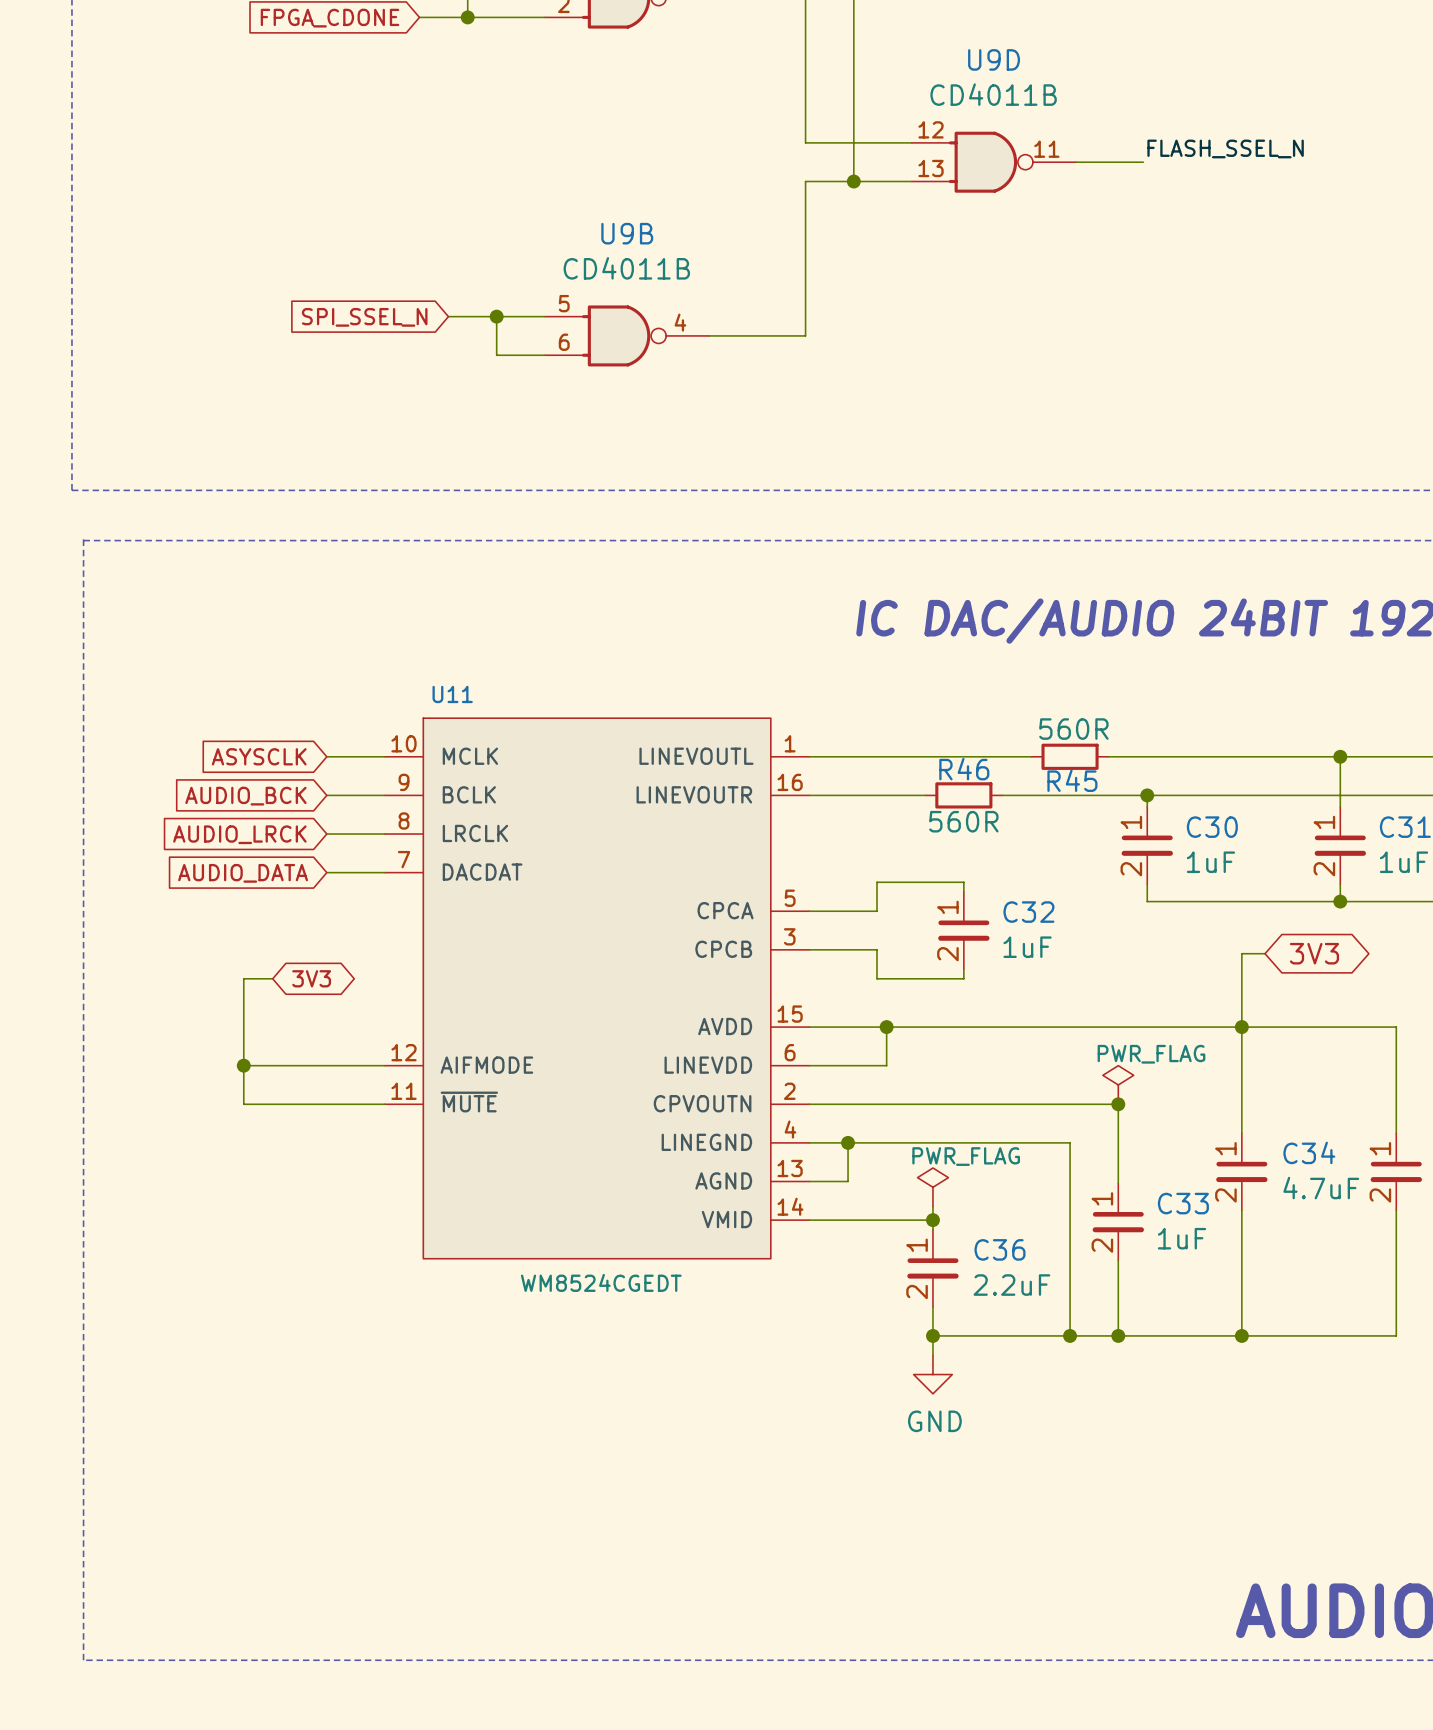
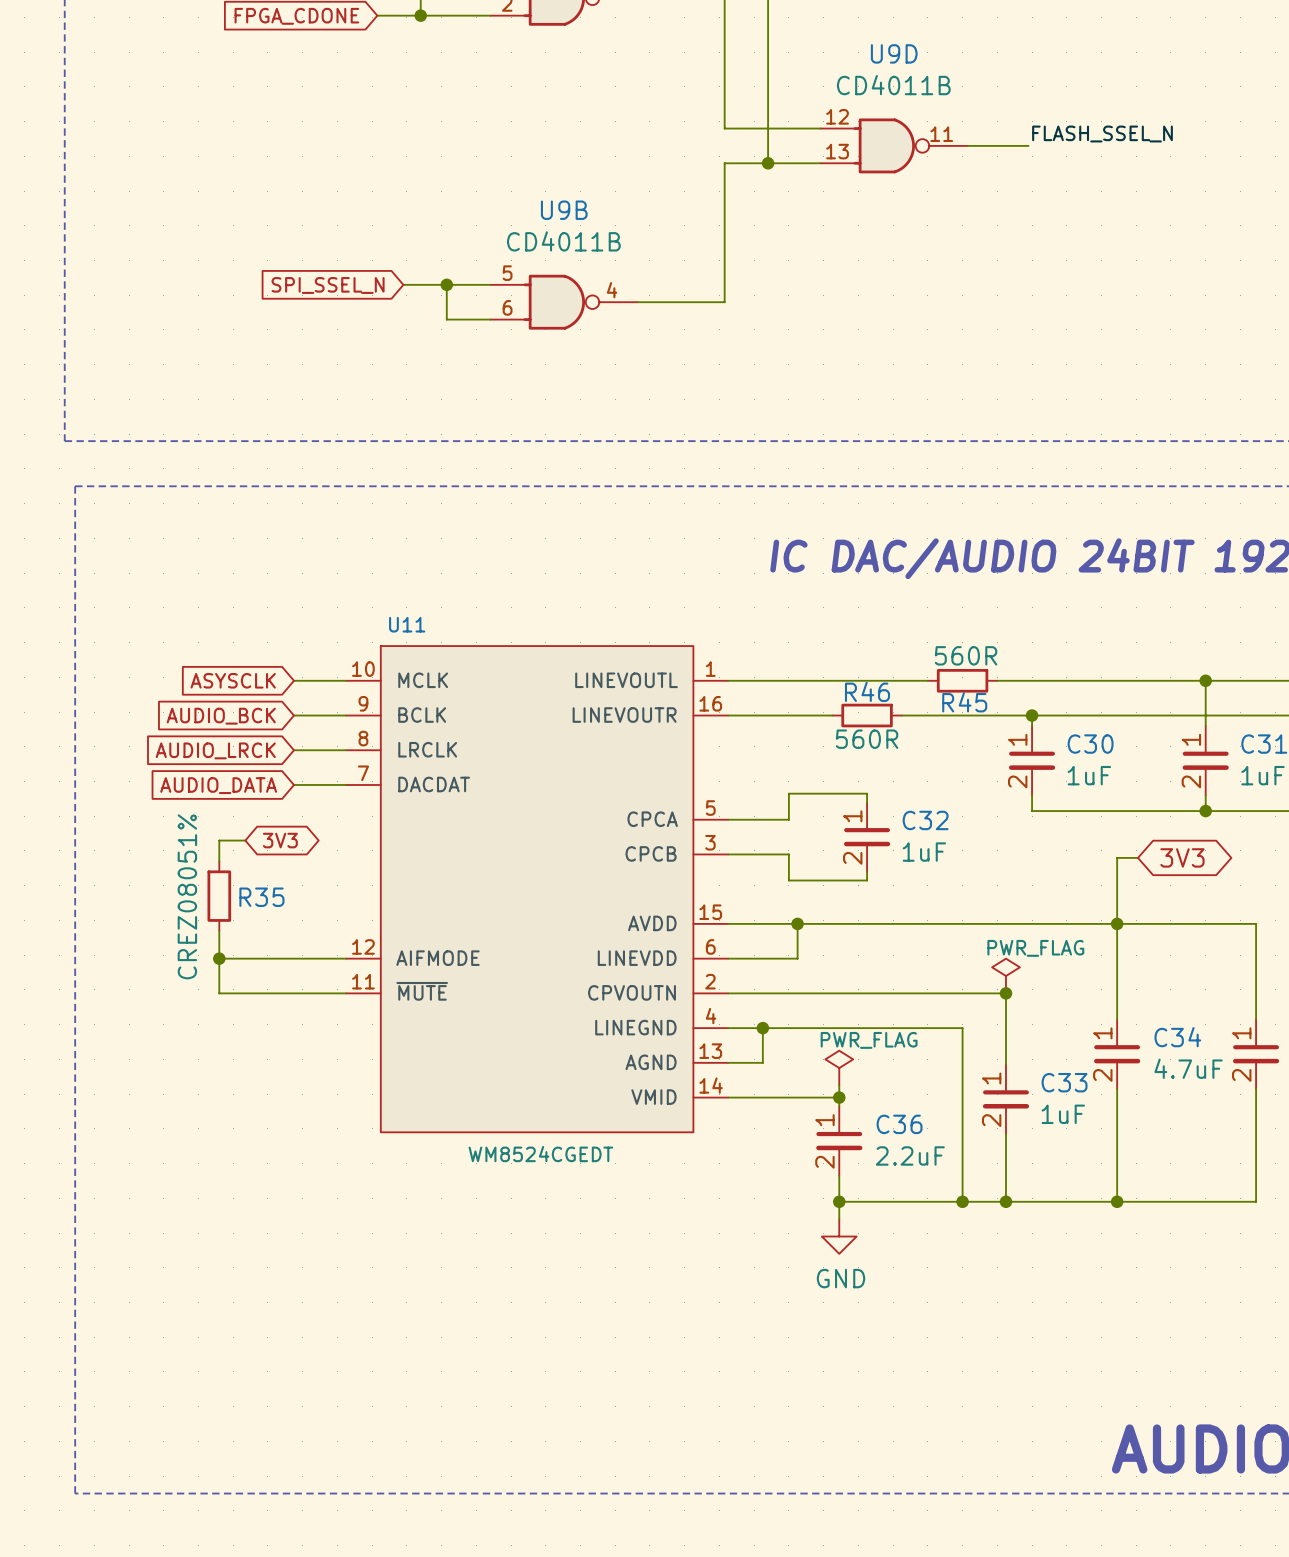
wire: none -> (245, 840) (219, 840) (219, 861)
wire: (272, 978) (243, 978) (243, 1034) -> none
global label position: 3V3 (311, 978) -> 3V3 (280, 840)
R35: none -> CREZ08051% (219, 896)

